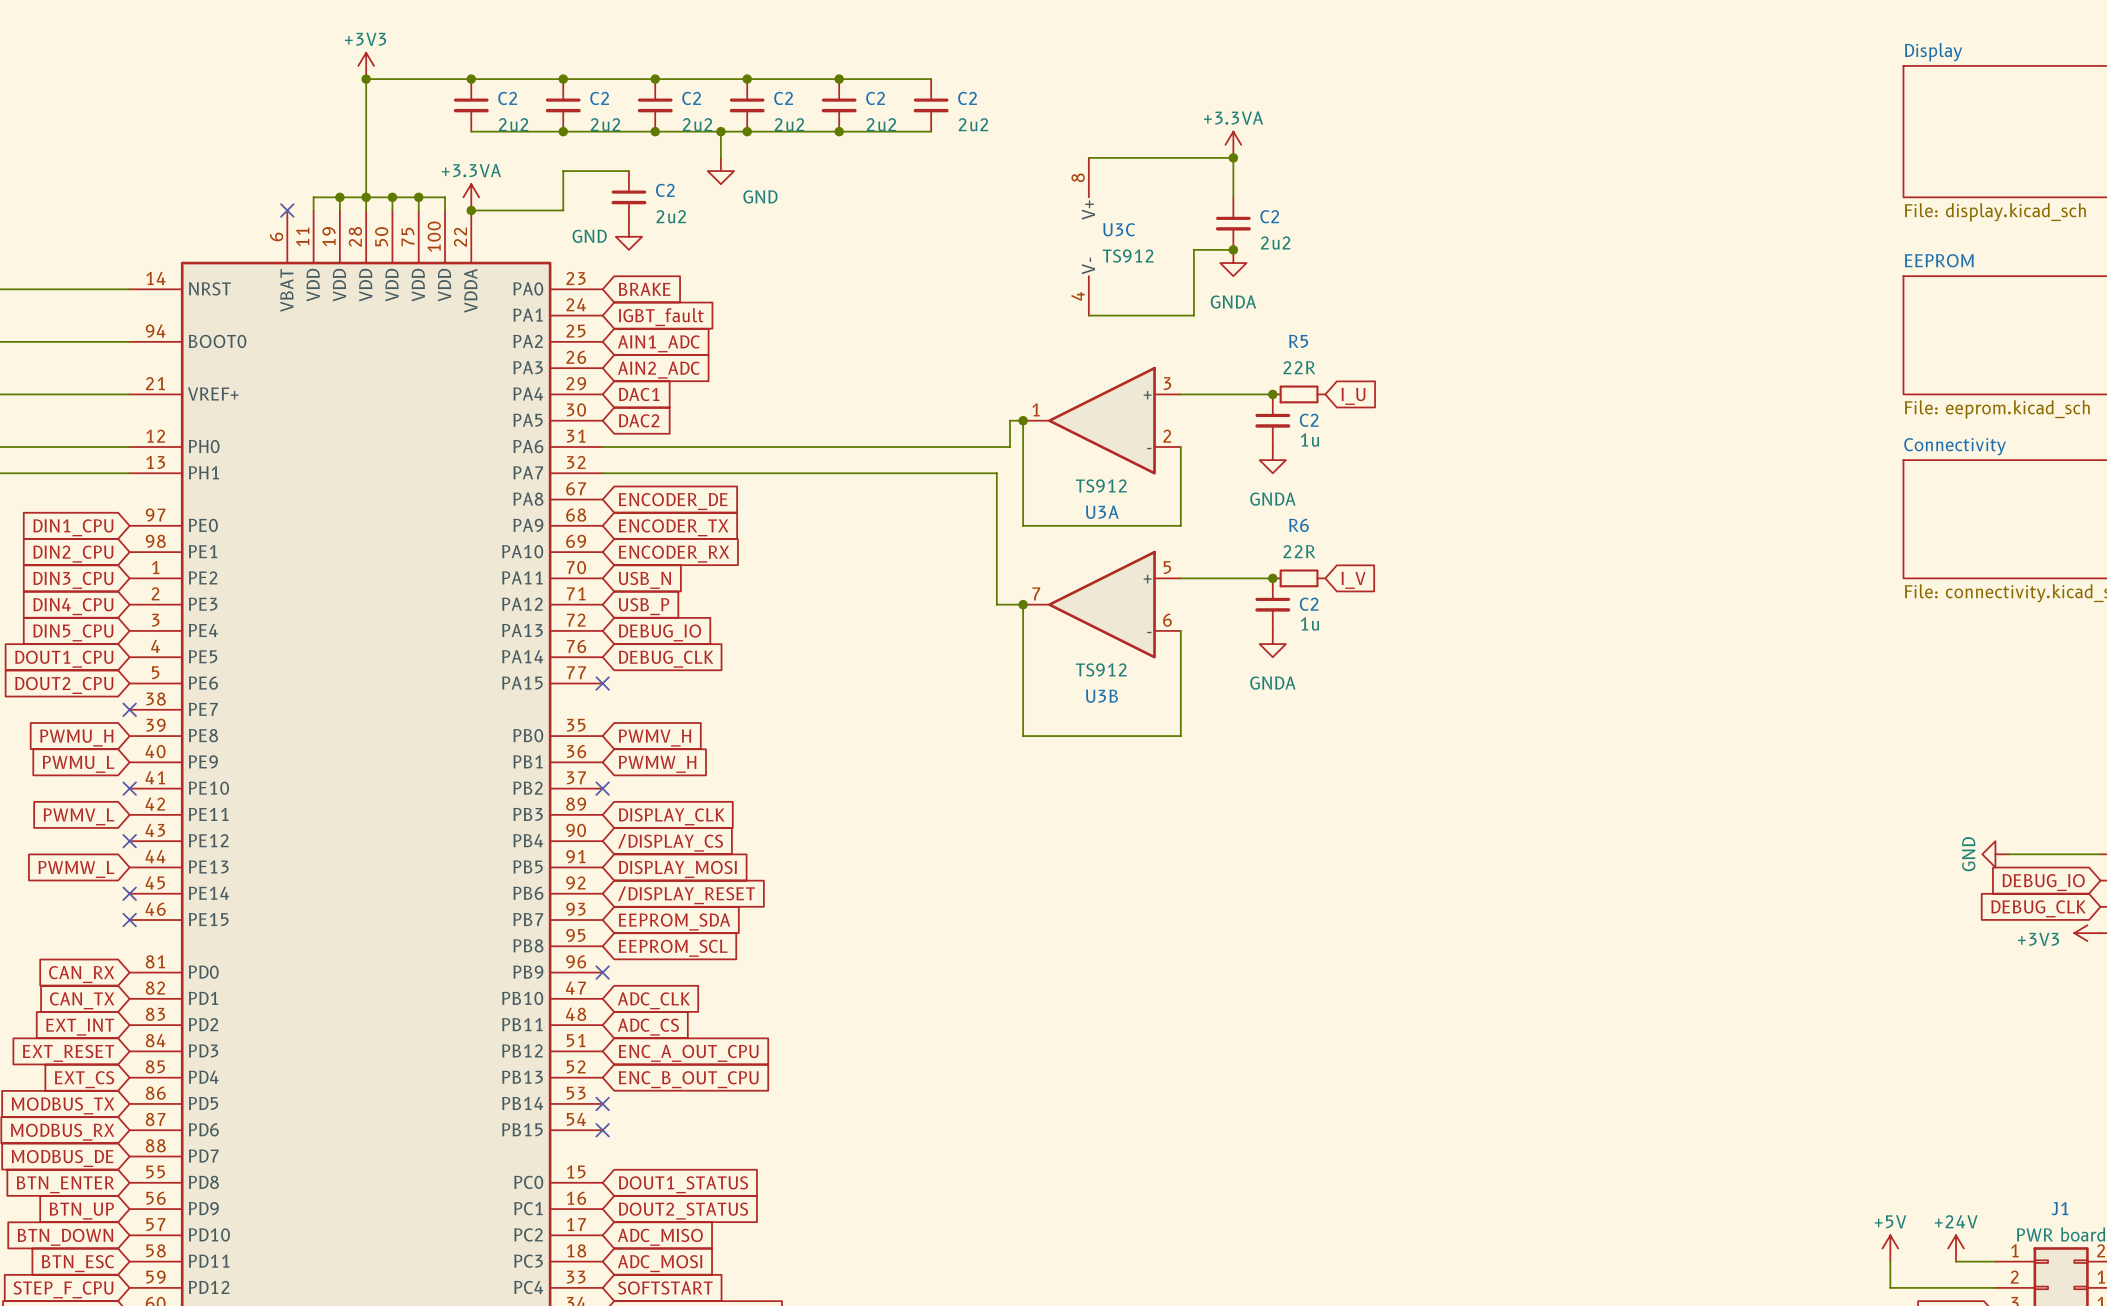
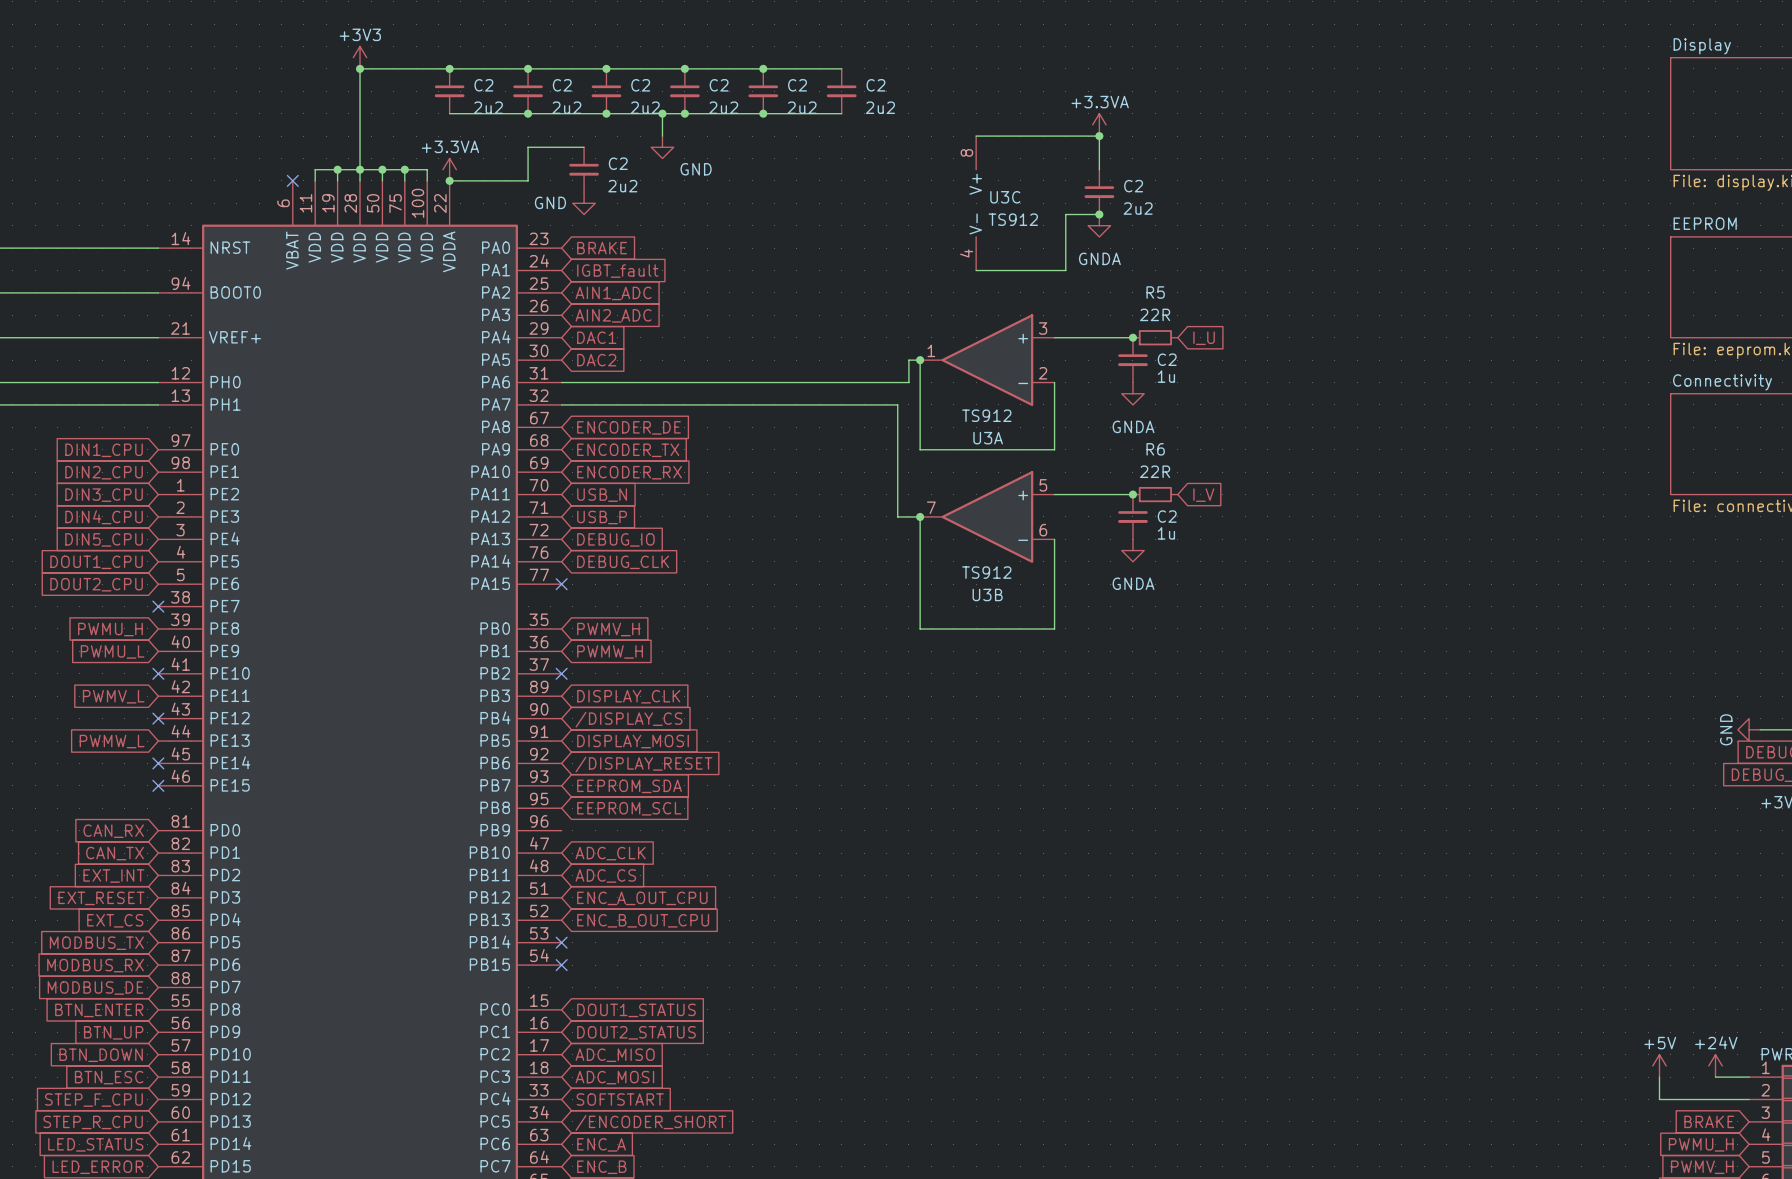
no-connect mark: (602, 972) -> none

